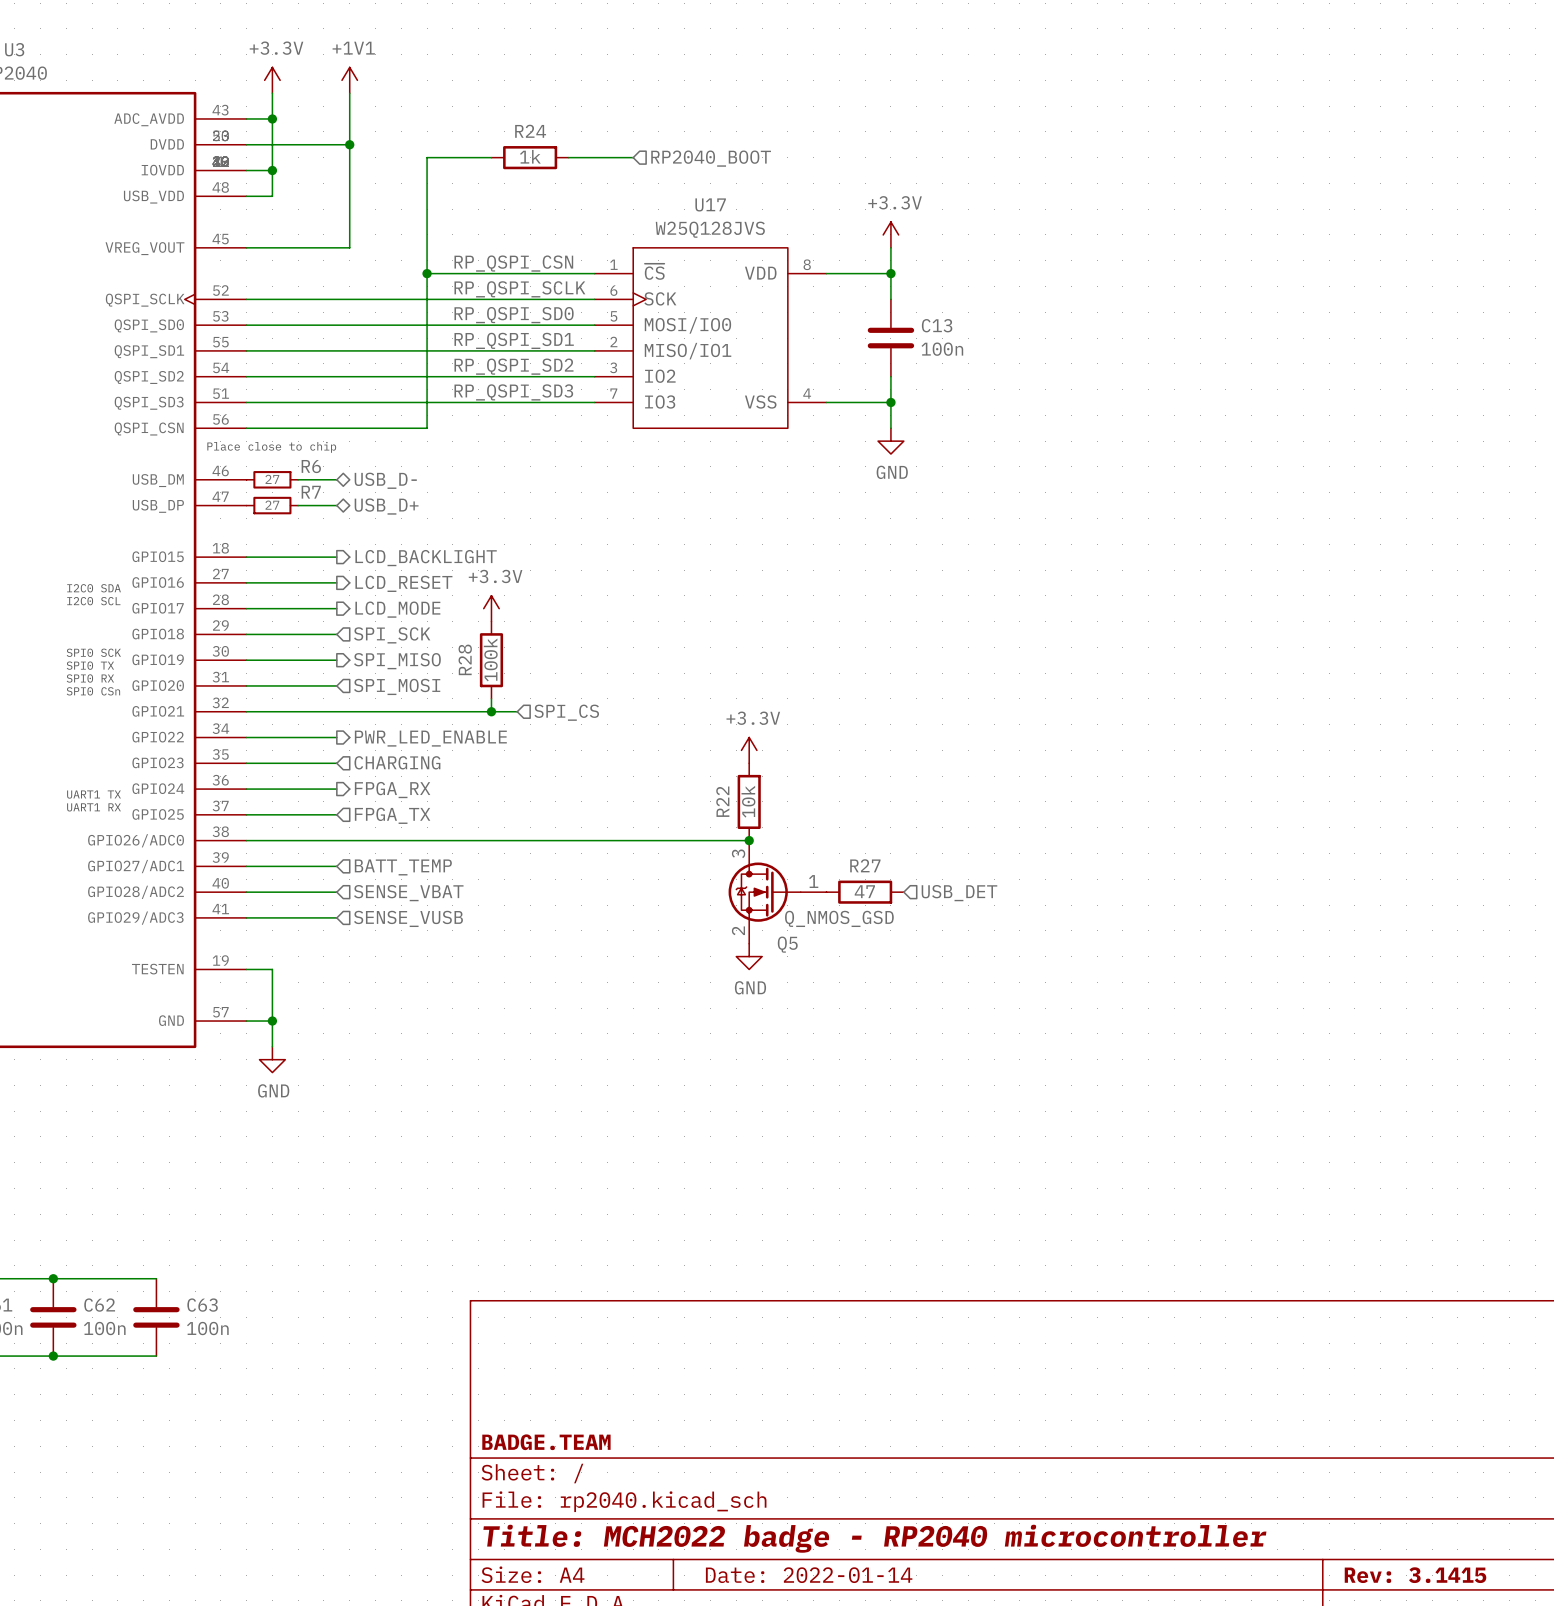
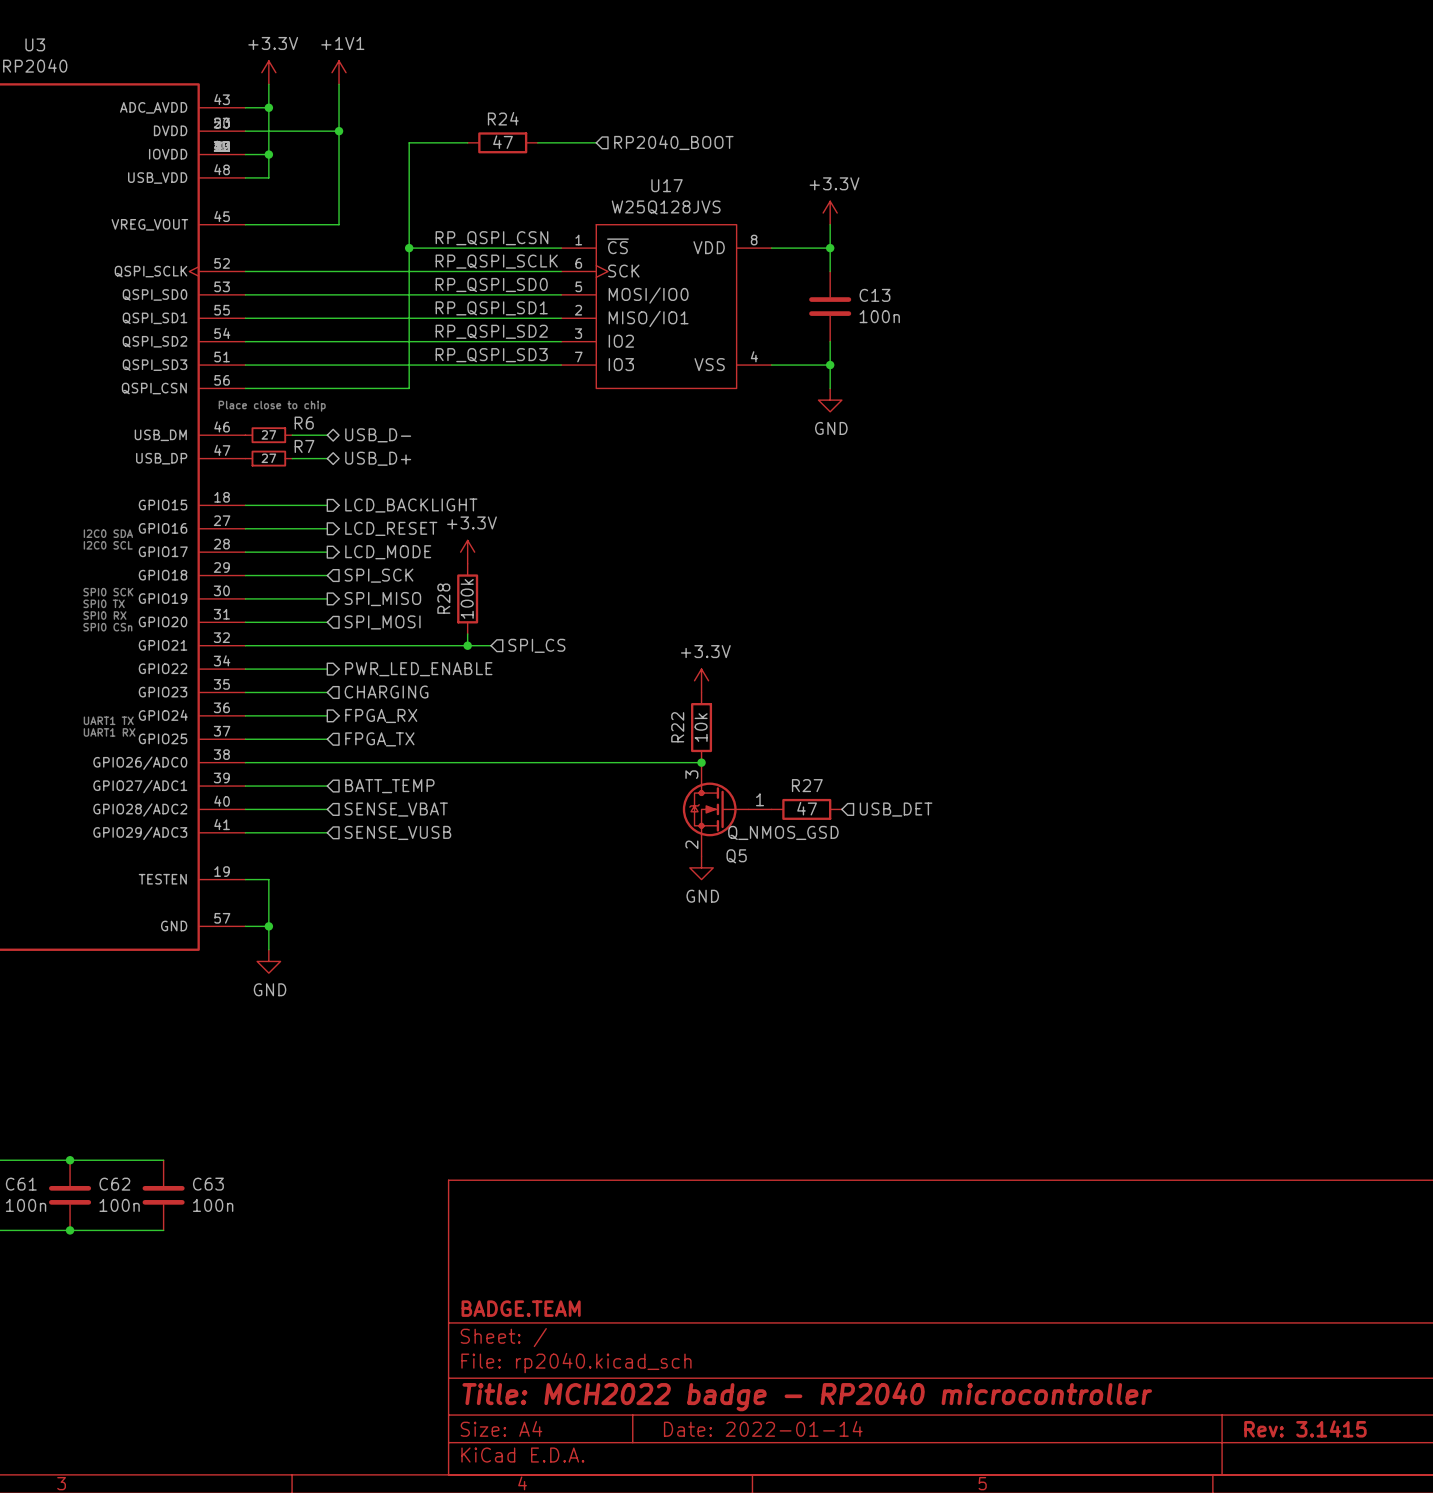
R24 value: 1k (530, 156) -> 47 (503, 142)

